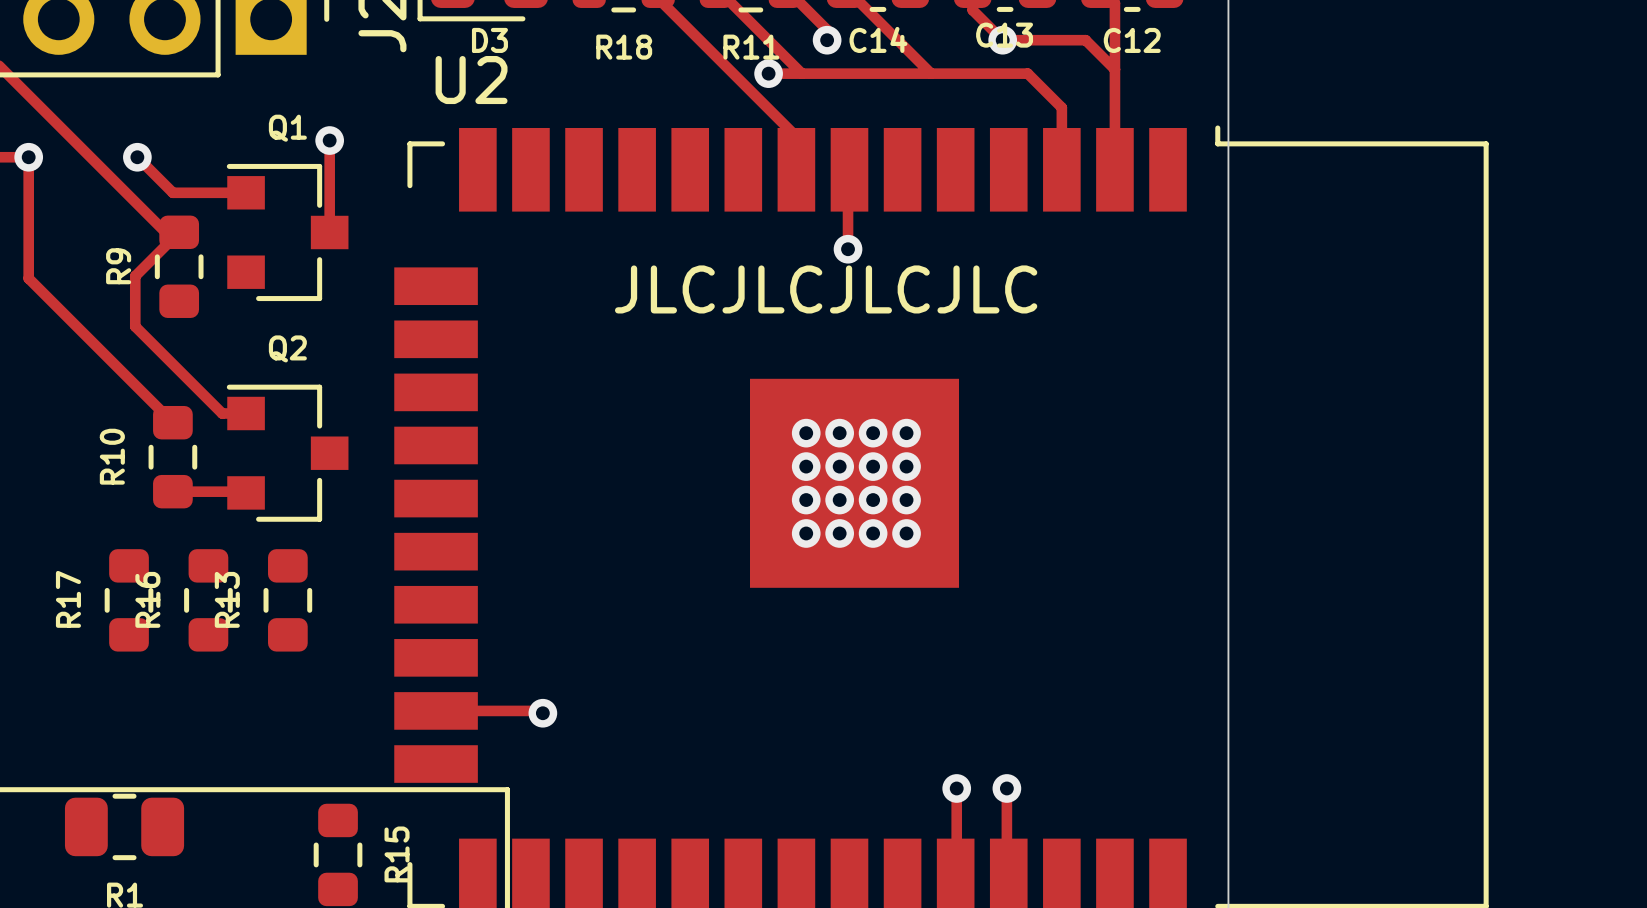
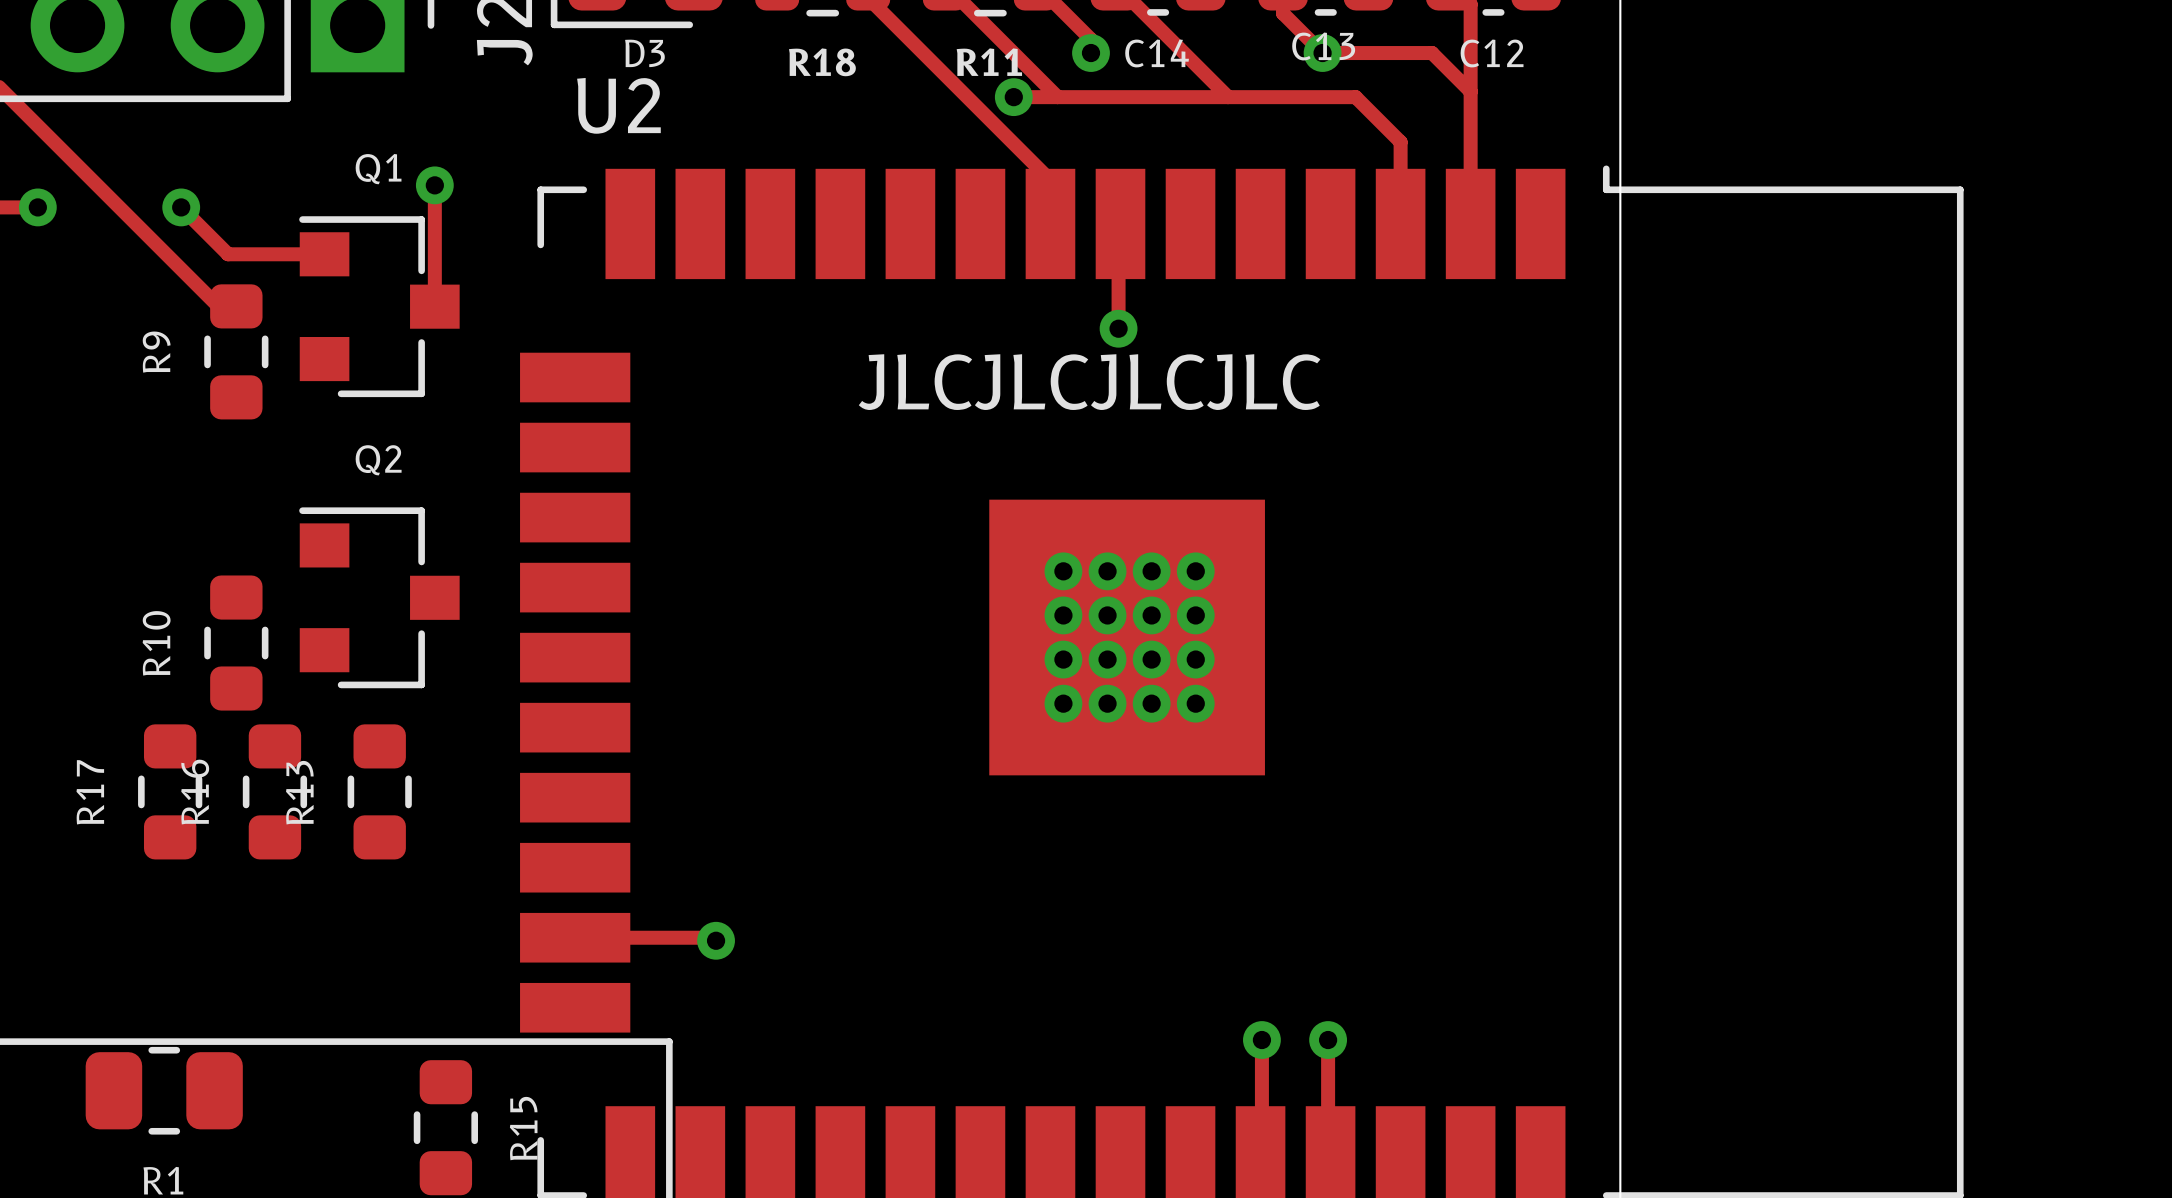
track: (28, 157) (28, 278) (172, 422) -> none
track: (179, 232) (135, 276) (135, 326) (222, 413) (246, 413) -> none
R10 position: (172, 457) -> (236, 643)
track: (172, 491) (246, 492) -> none

